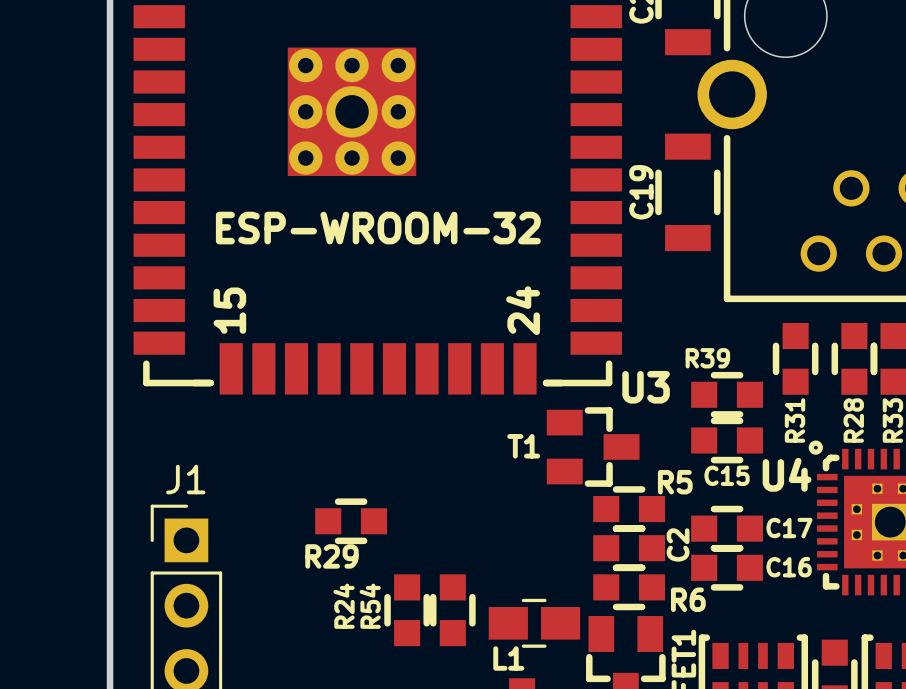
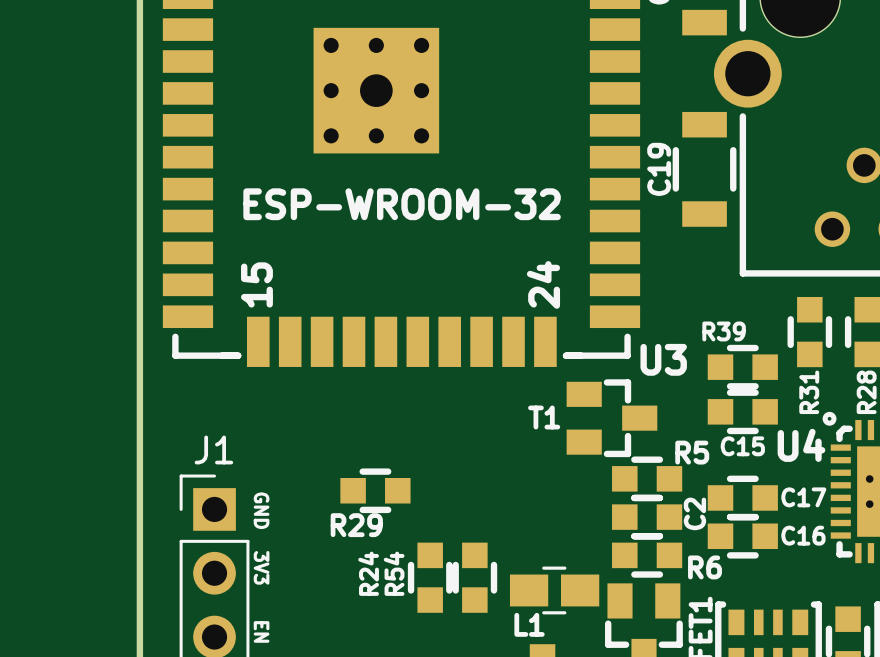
text: none -> GND (261, 510)
text: none -> 3V3 (261, 567)
text: none -> EN (261, 631)

